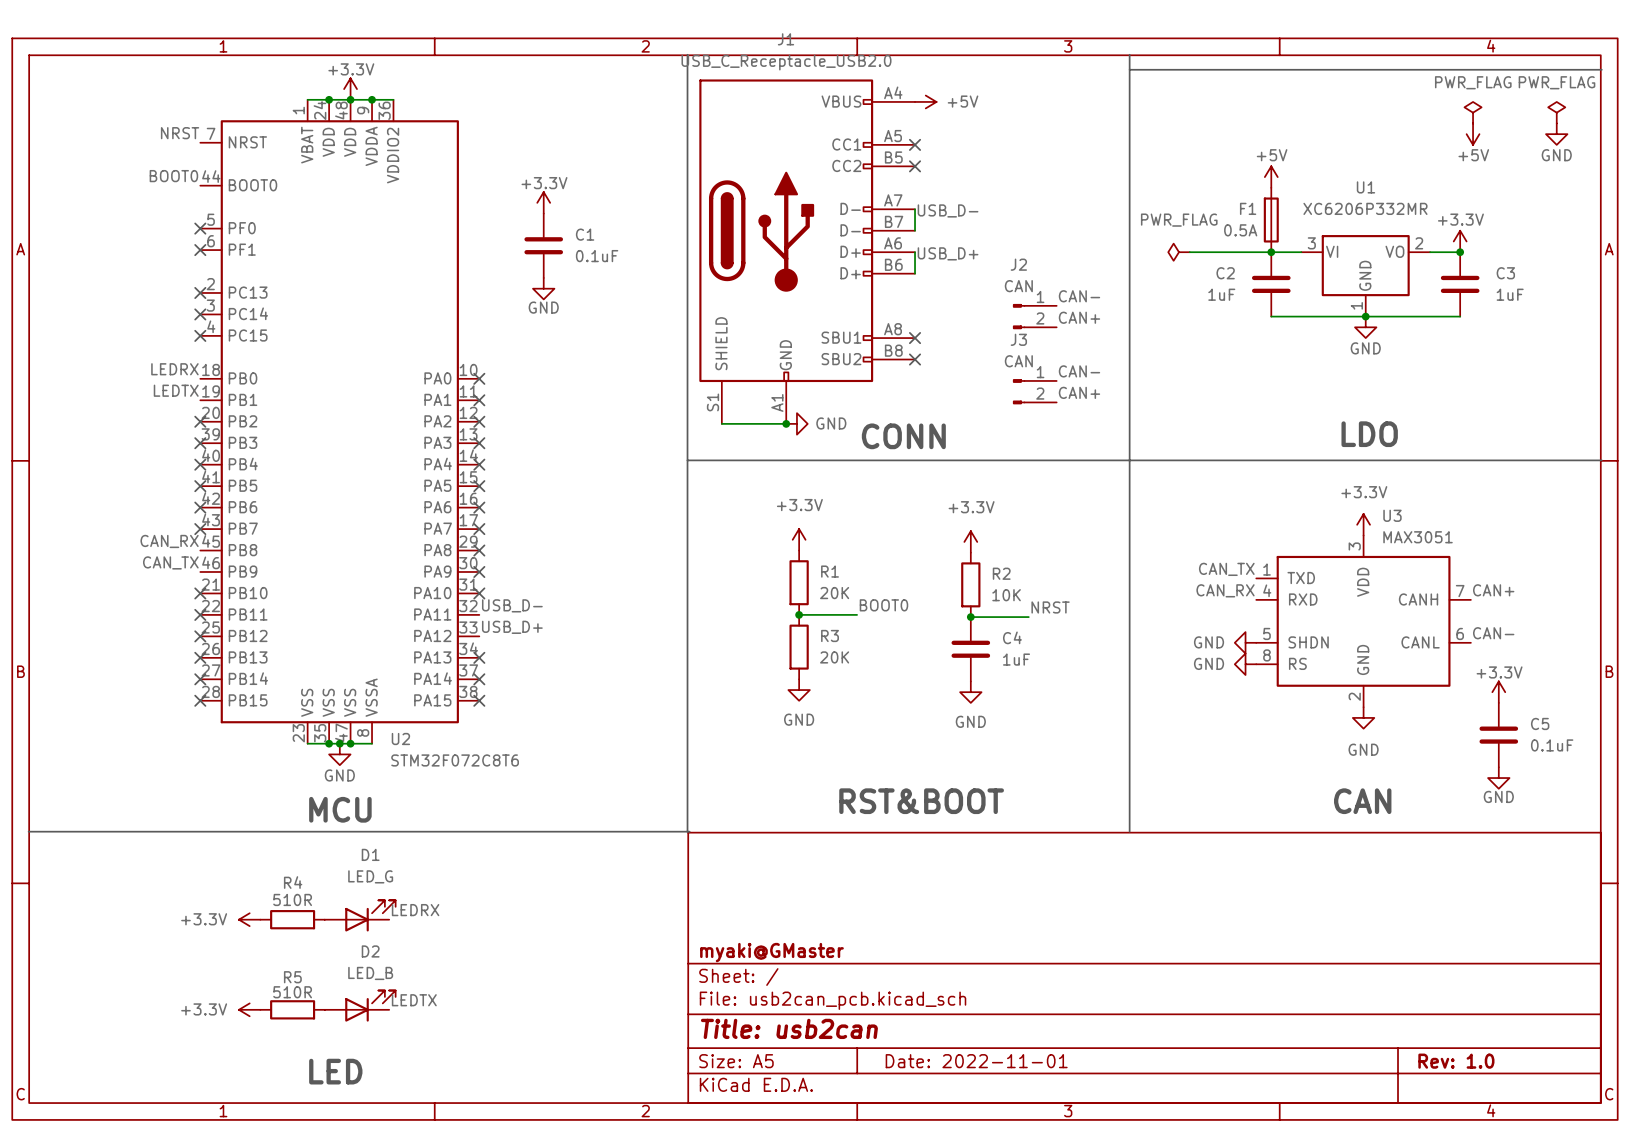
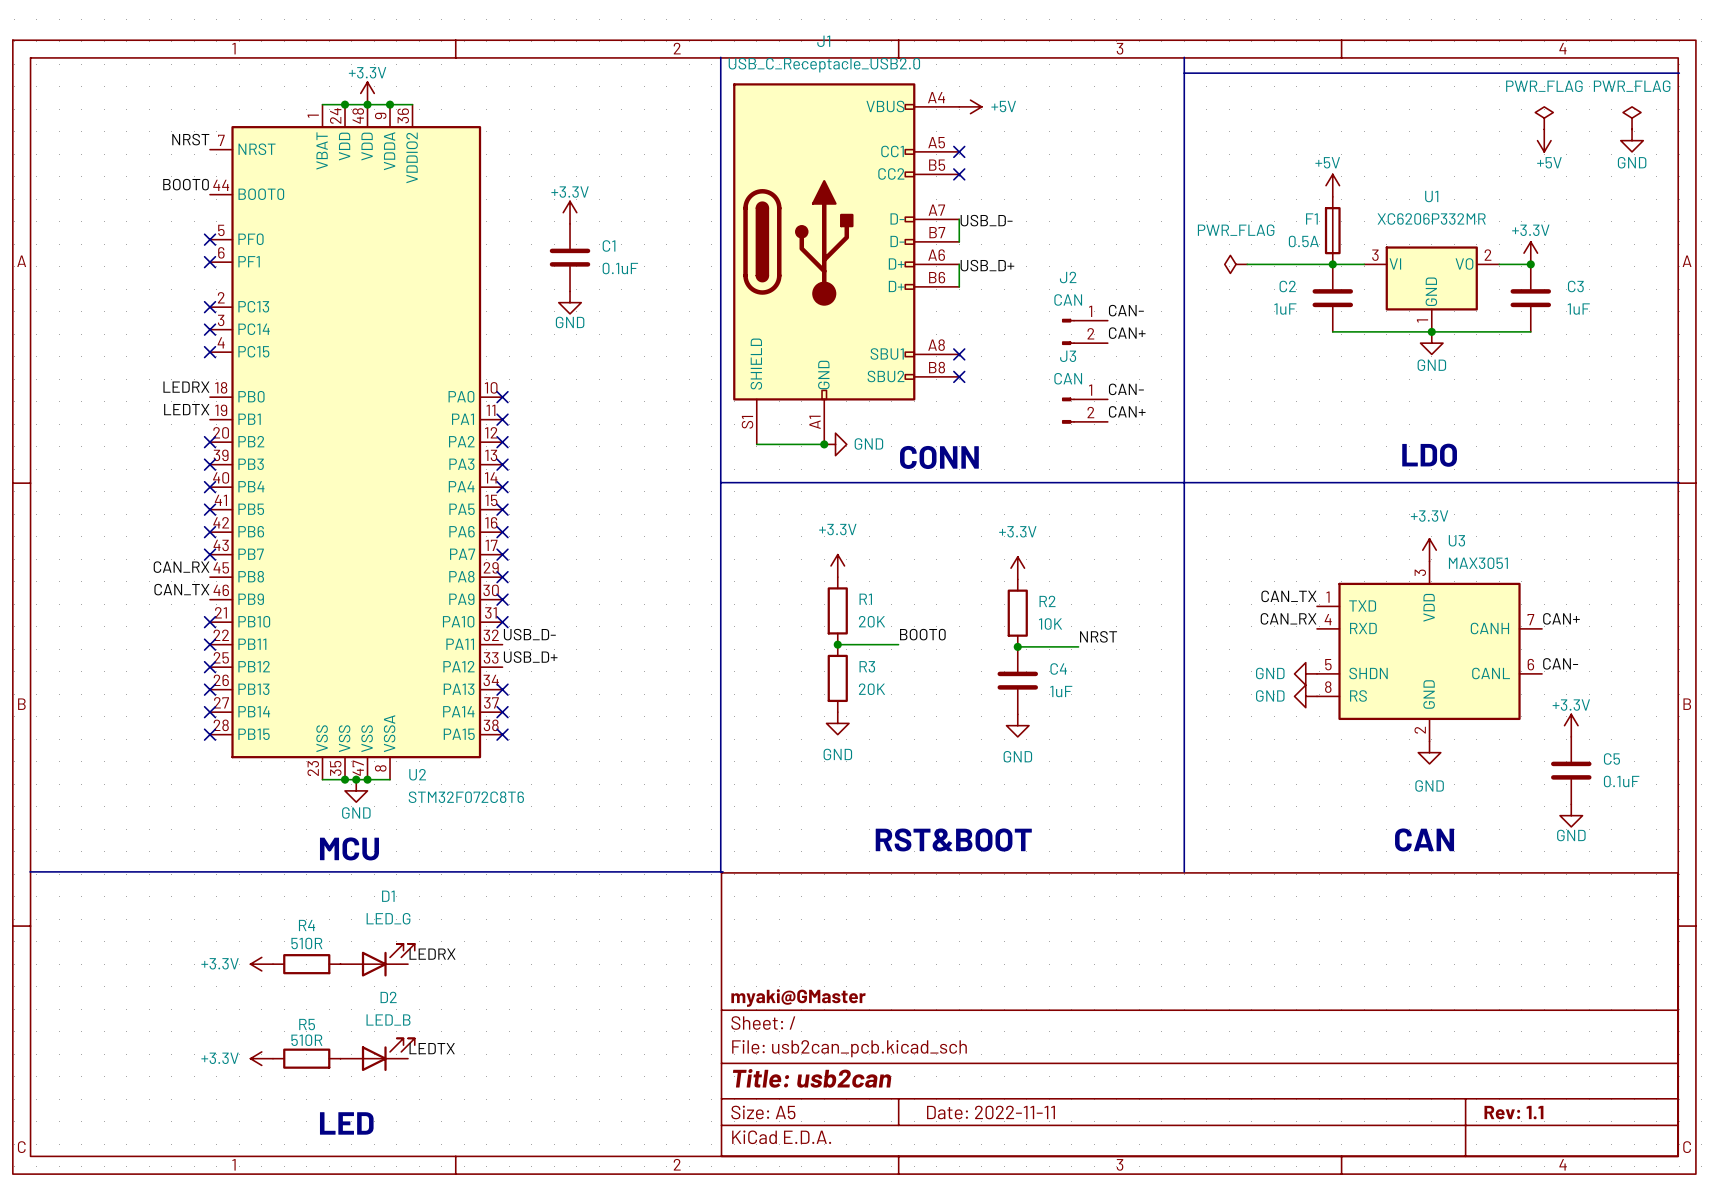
title block: Date: 2022-11-01 (976, 1061) -> Date: 2022-11-11 (990, 1112)
title block: Rev: 1.0 (1456, 1061) -> Rev: 1.1 (1513, 1112)

